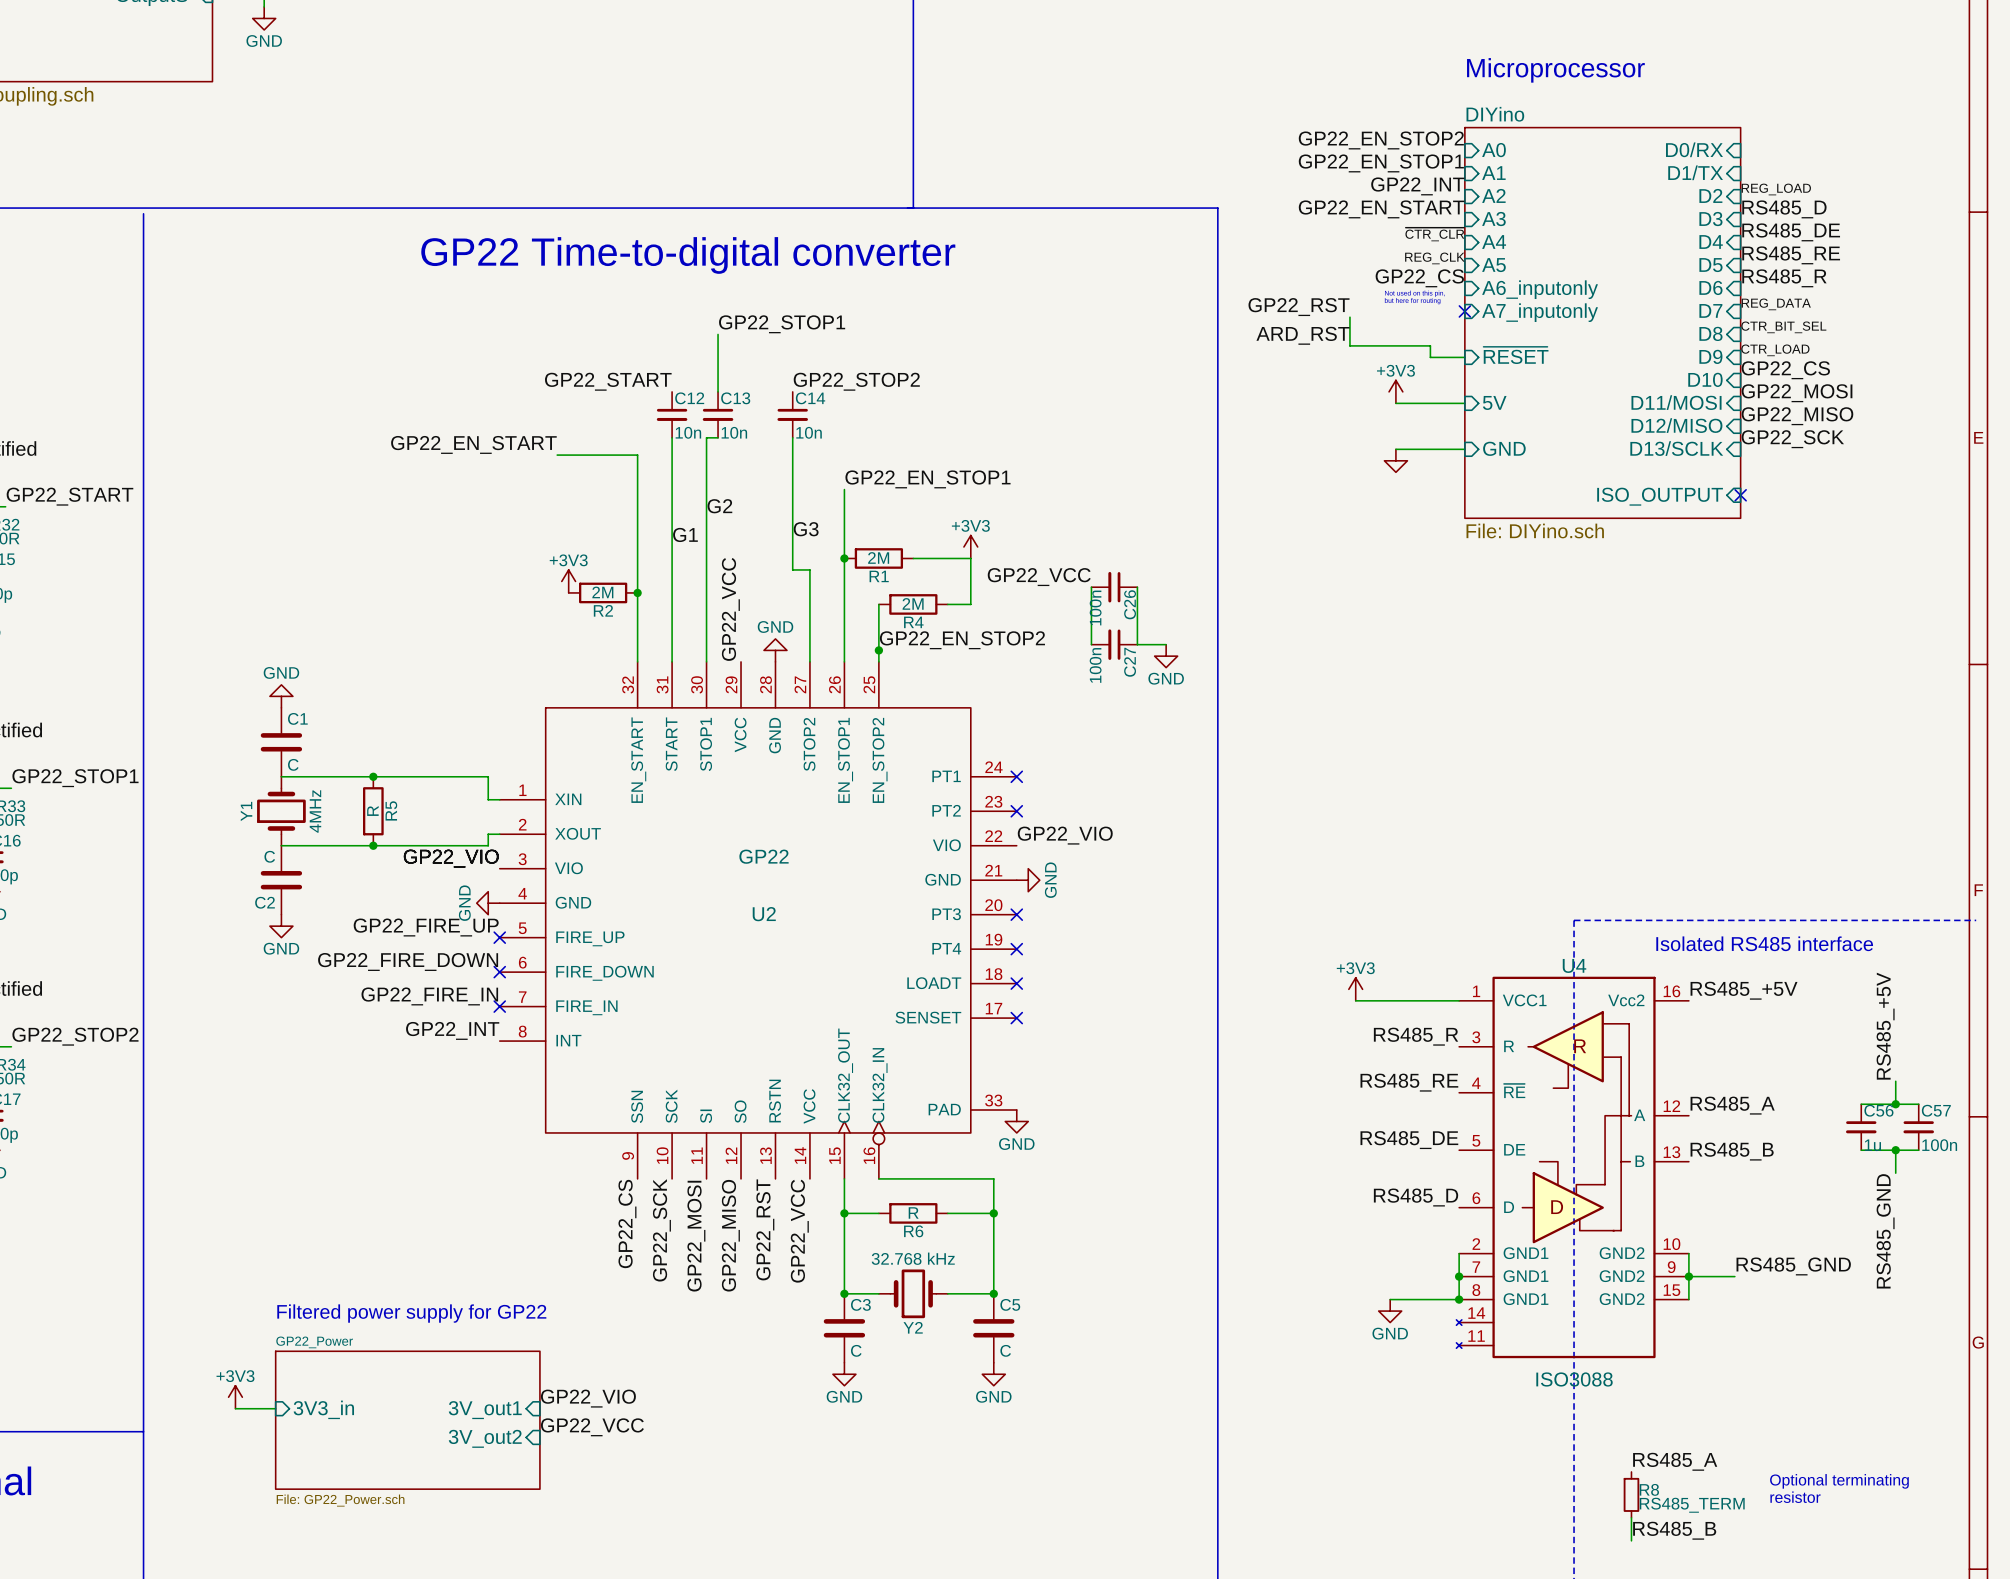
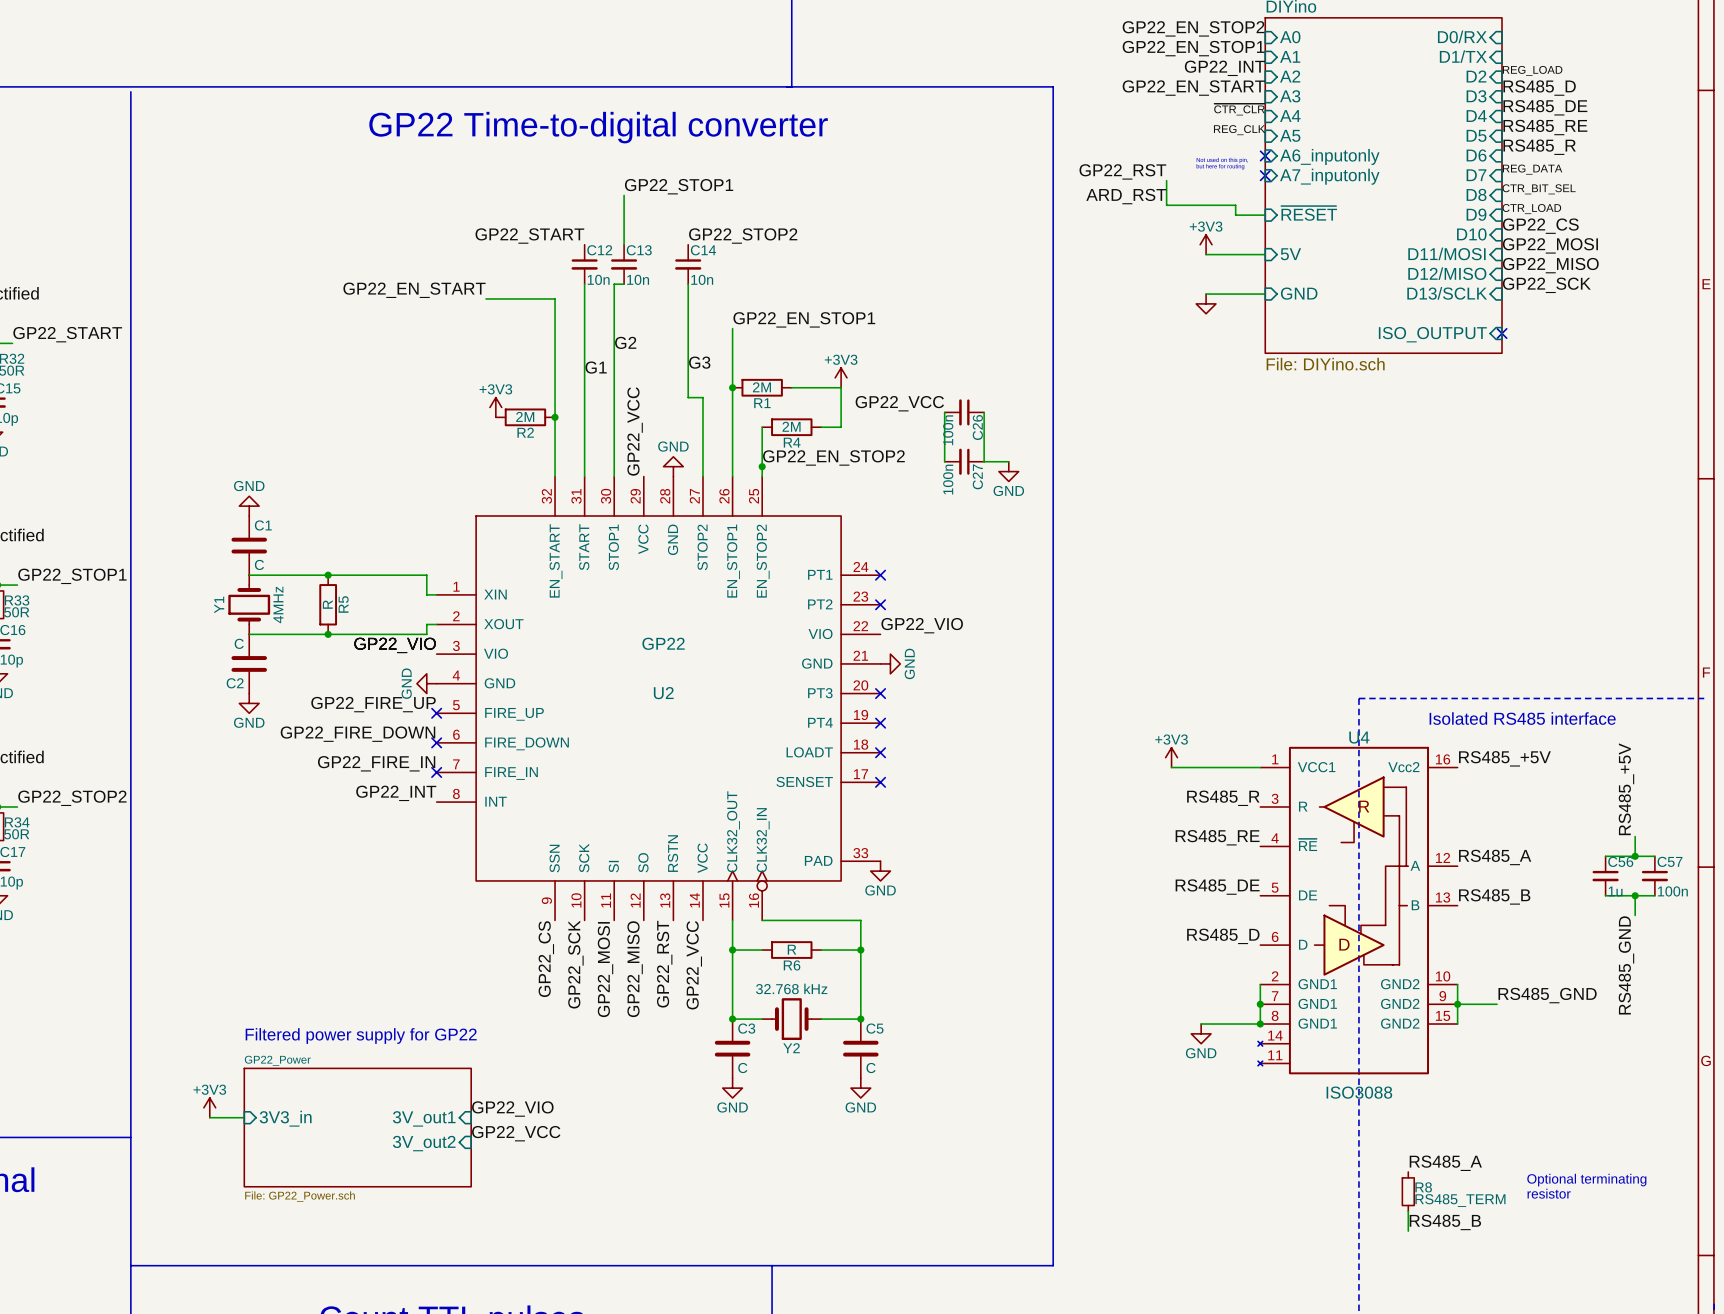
label: GP22_CS (1419, 278) -> none
no-connect mark: none -> (1265, 155)

